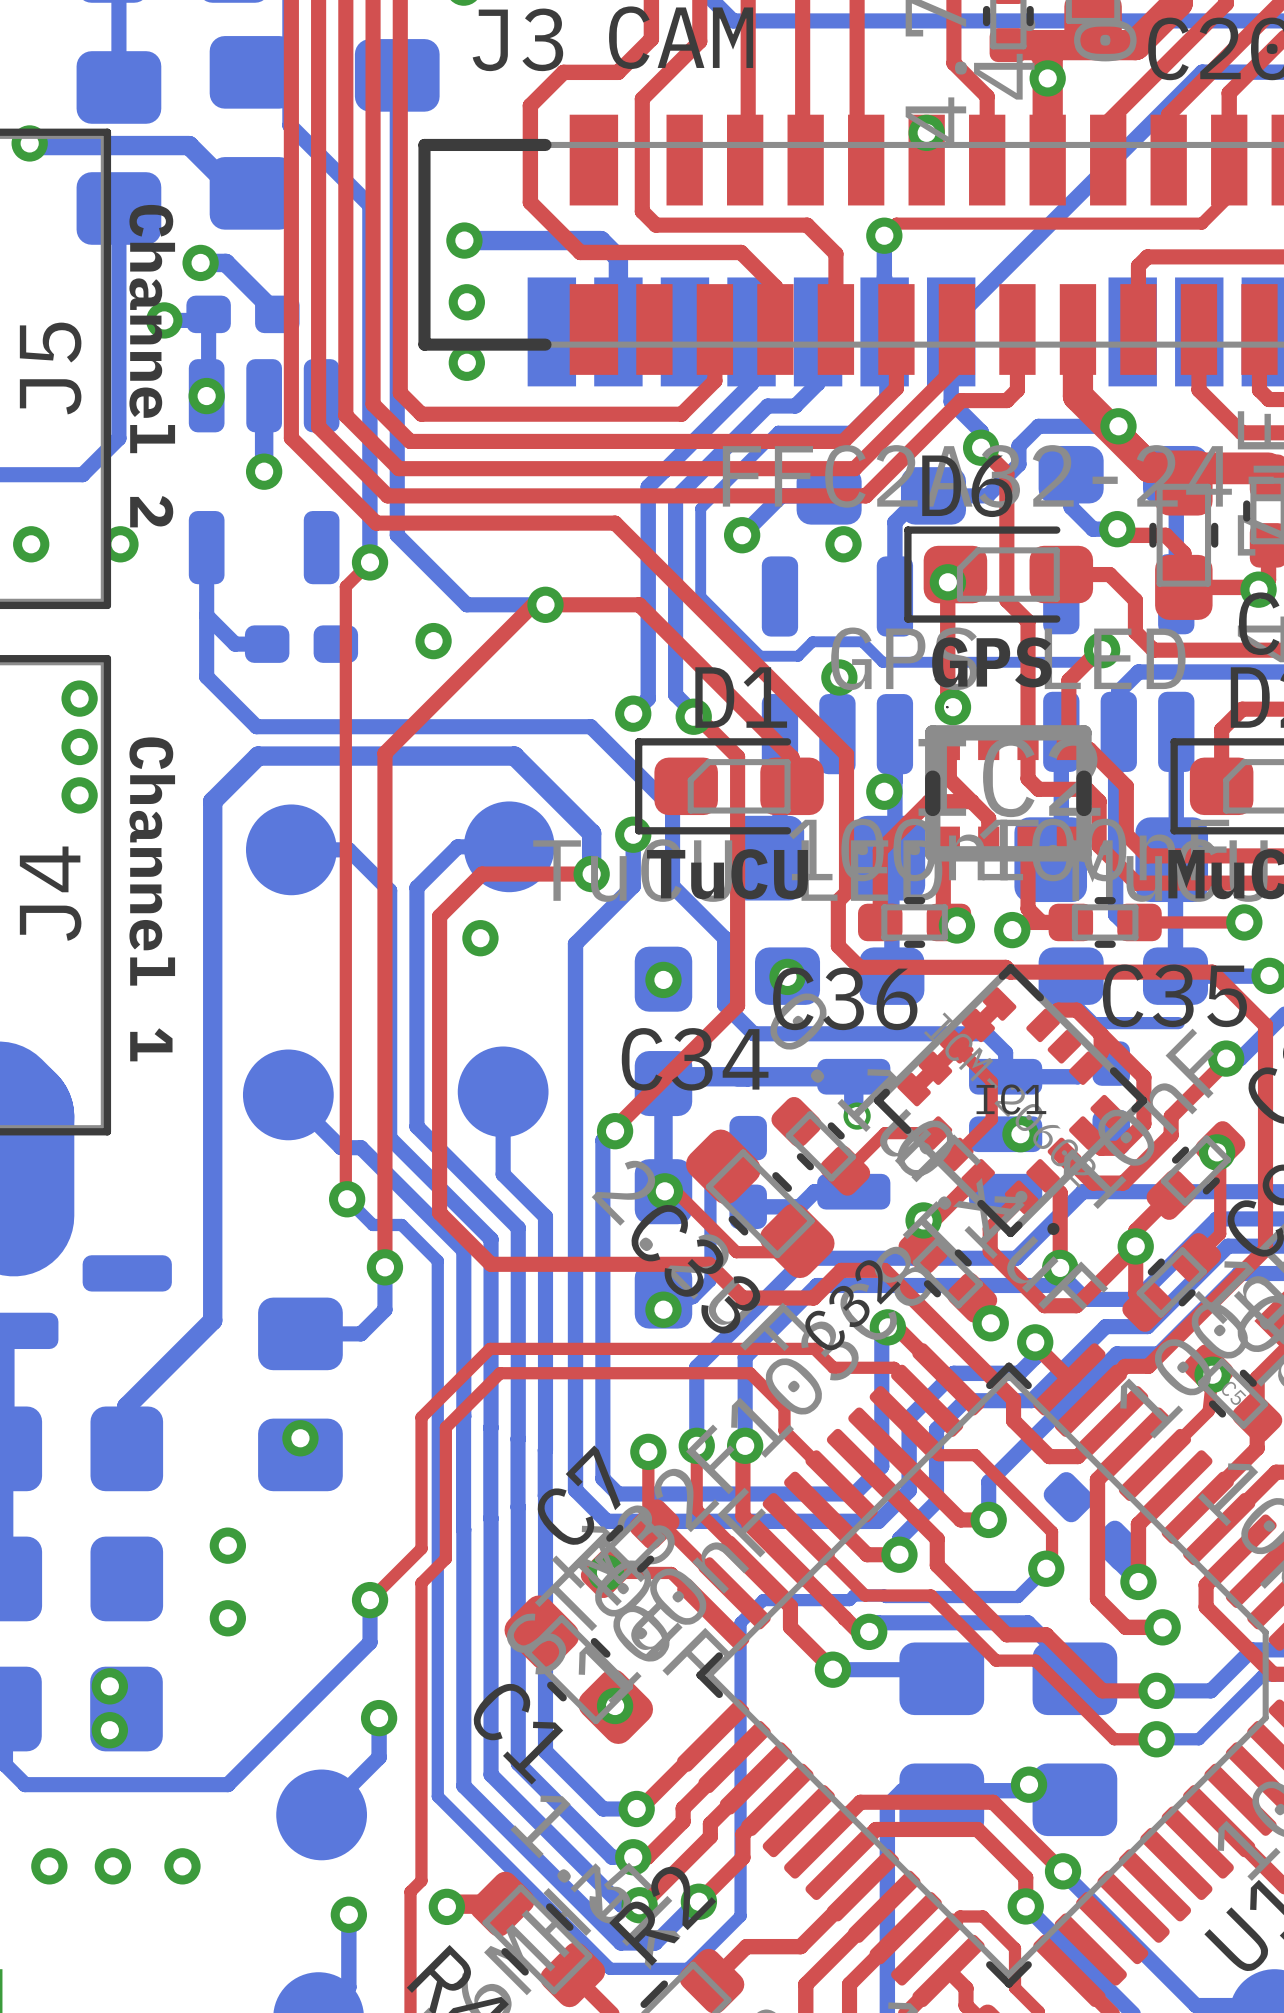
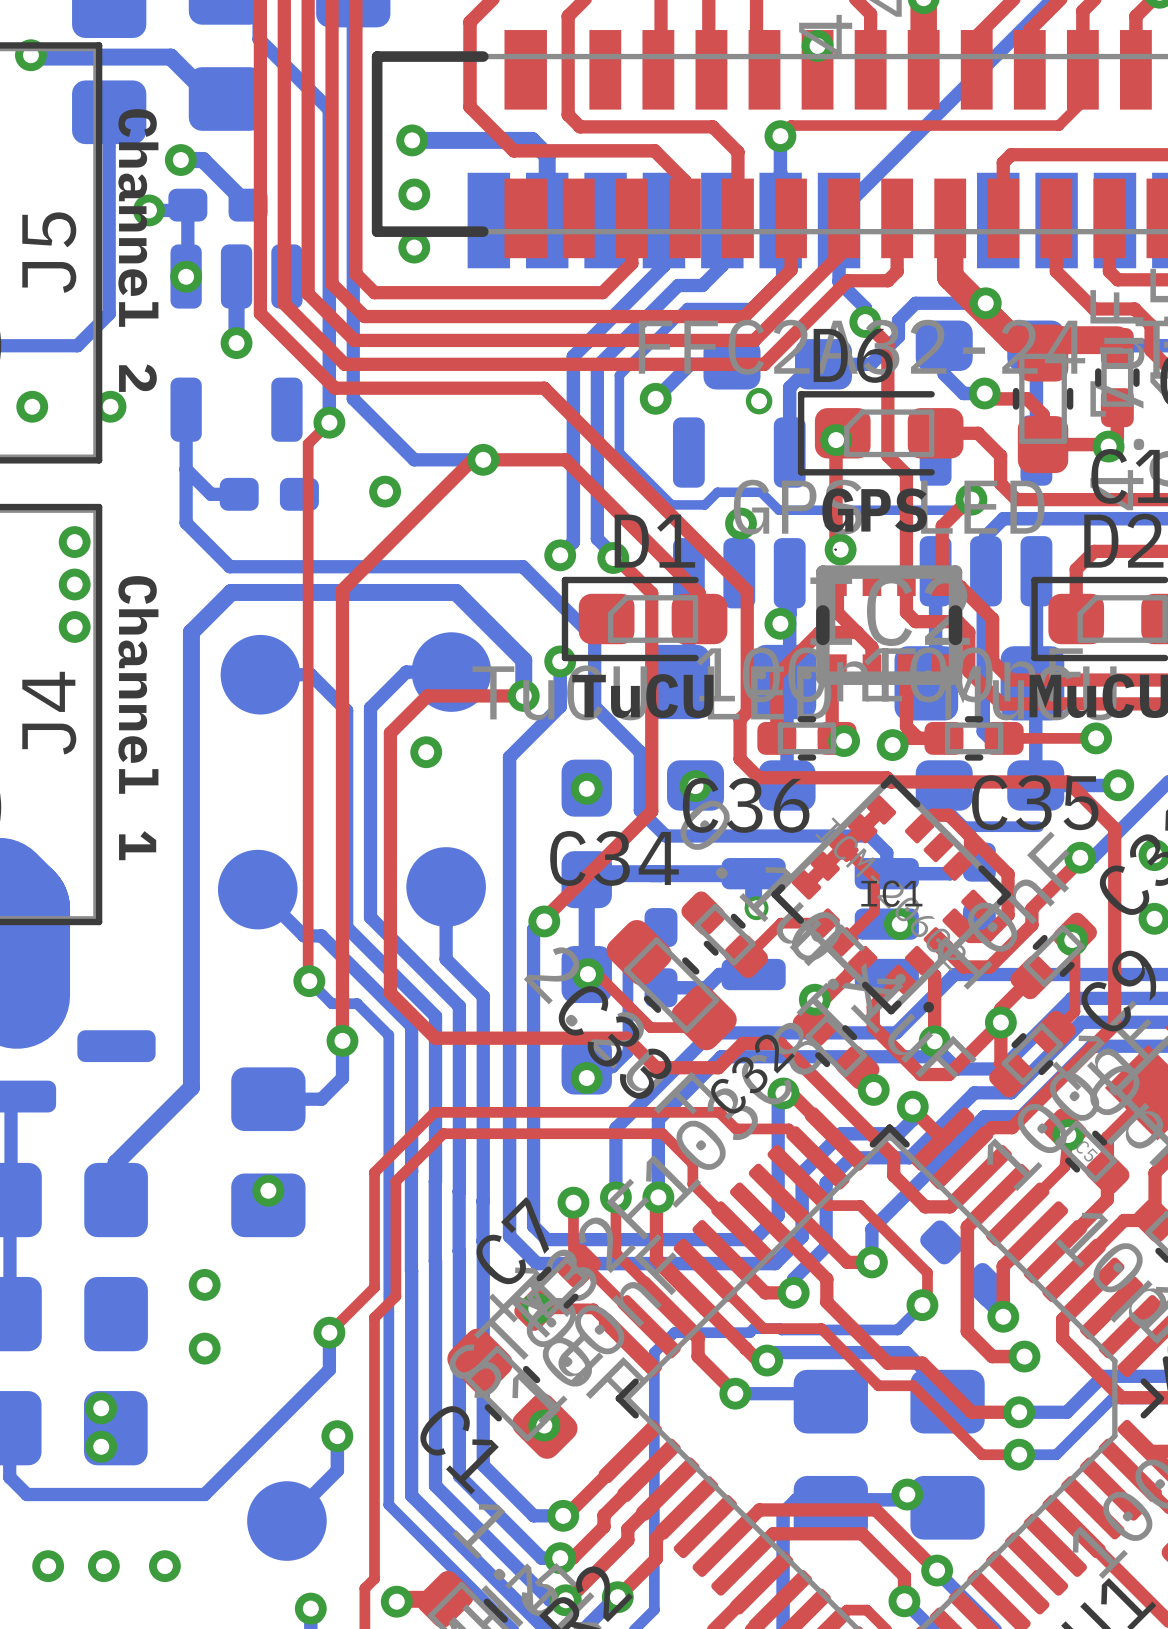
via position: (843, 544) -> (759, 401)

